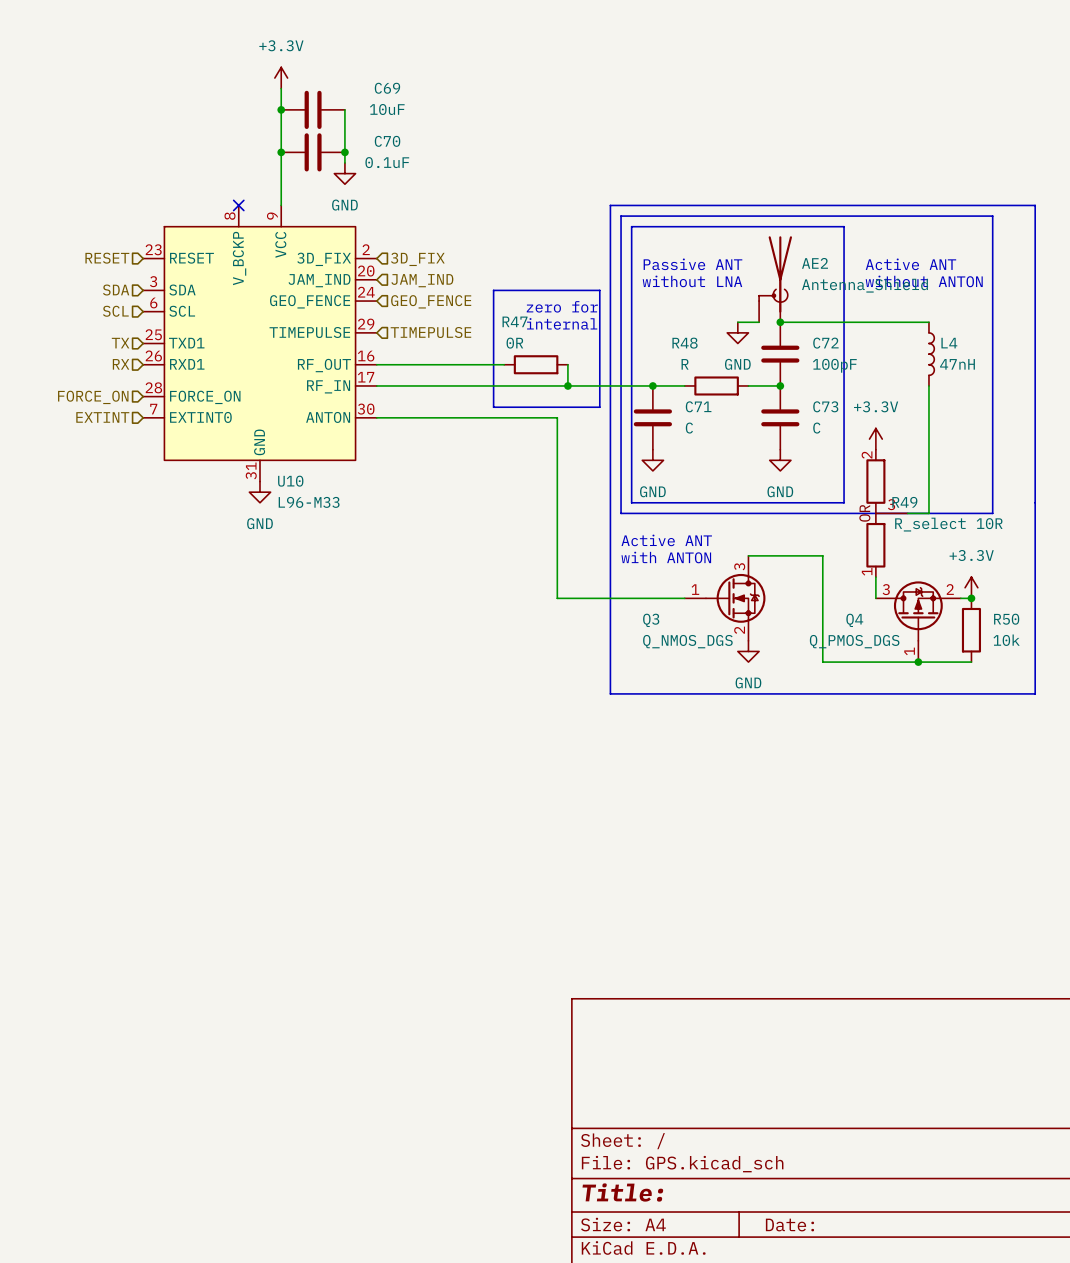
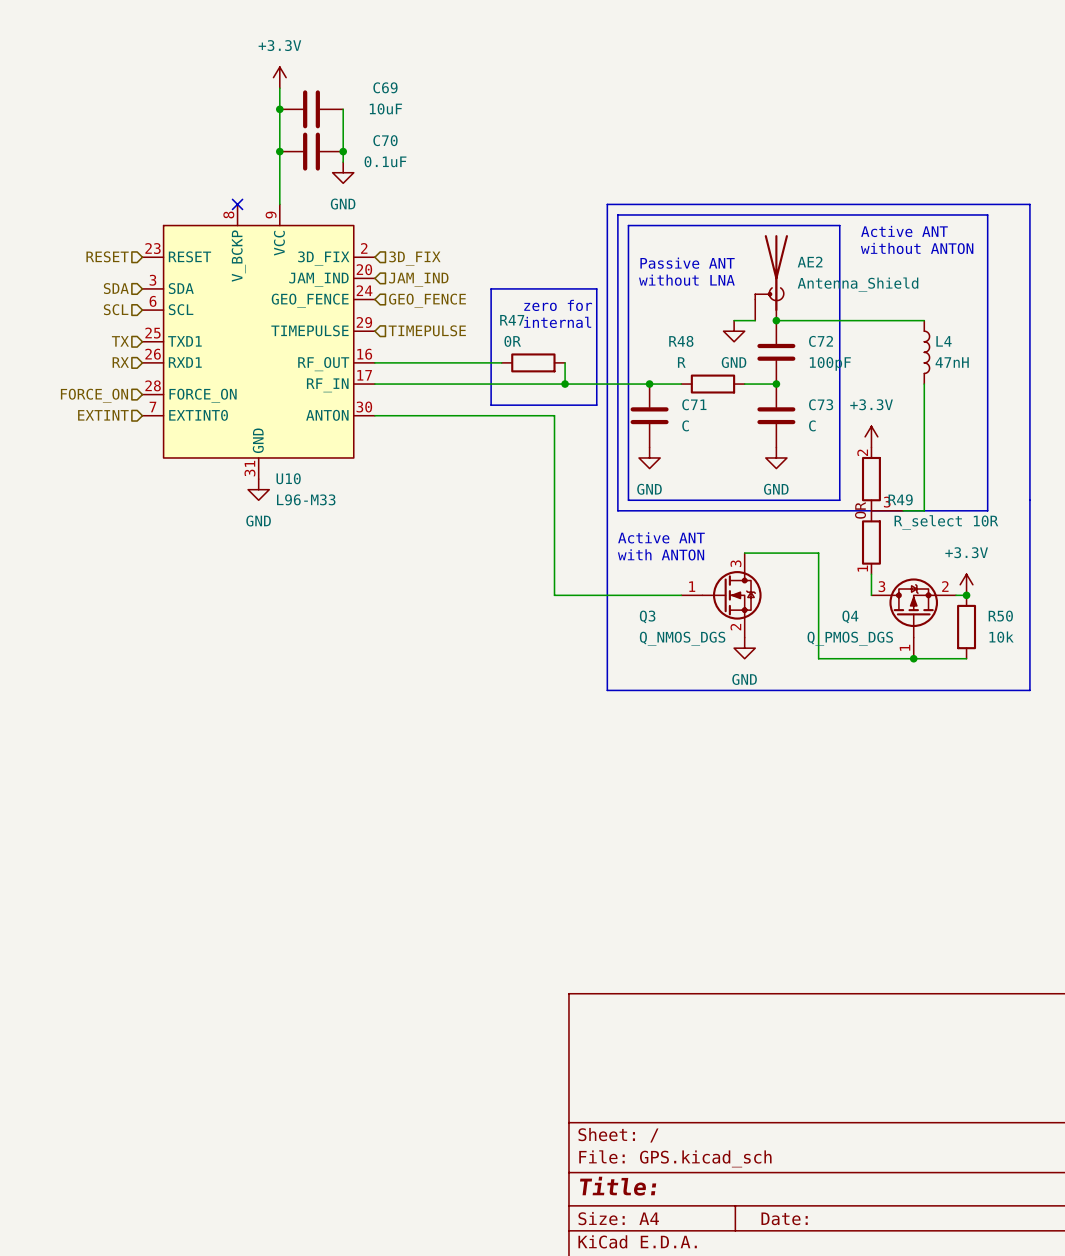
text position: Active ANT (910, 264) -> Active ANT (904, 231)
text position: without ANTON (924, 281) -> without ANTON (917, 248)

